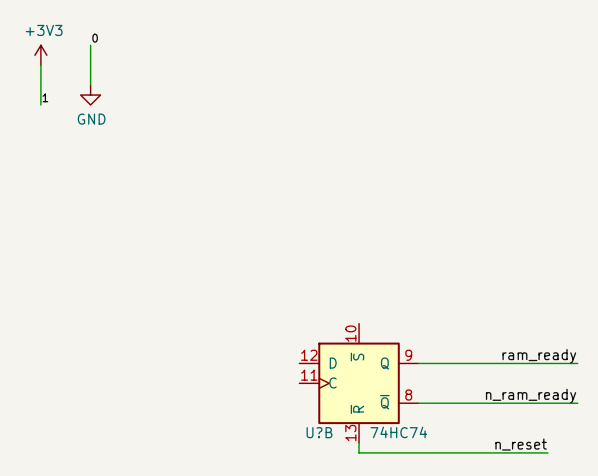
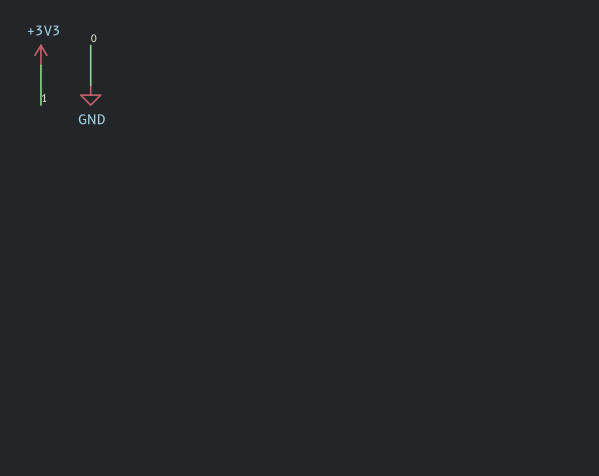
label: ram_ready (539, 356) -> none
wire: (418, 363) (577, 363) -> none
U?B: 74HC74 (359, 383) -> none
label: n_ram_ready (531, 396) -> none
wire: (418, 403) (577, 403) -> none
wire: (359, 442) (359, 452) (547, 452) -> none
label: n_reset (521, 444) -> none

